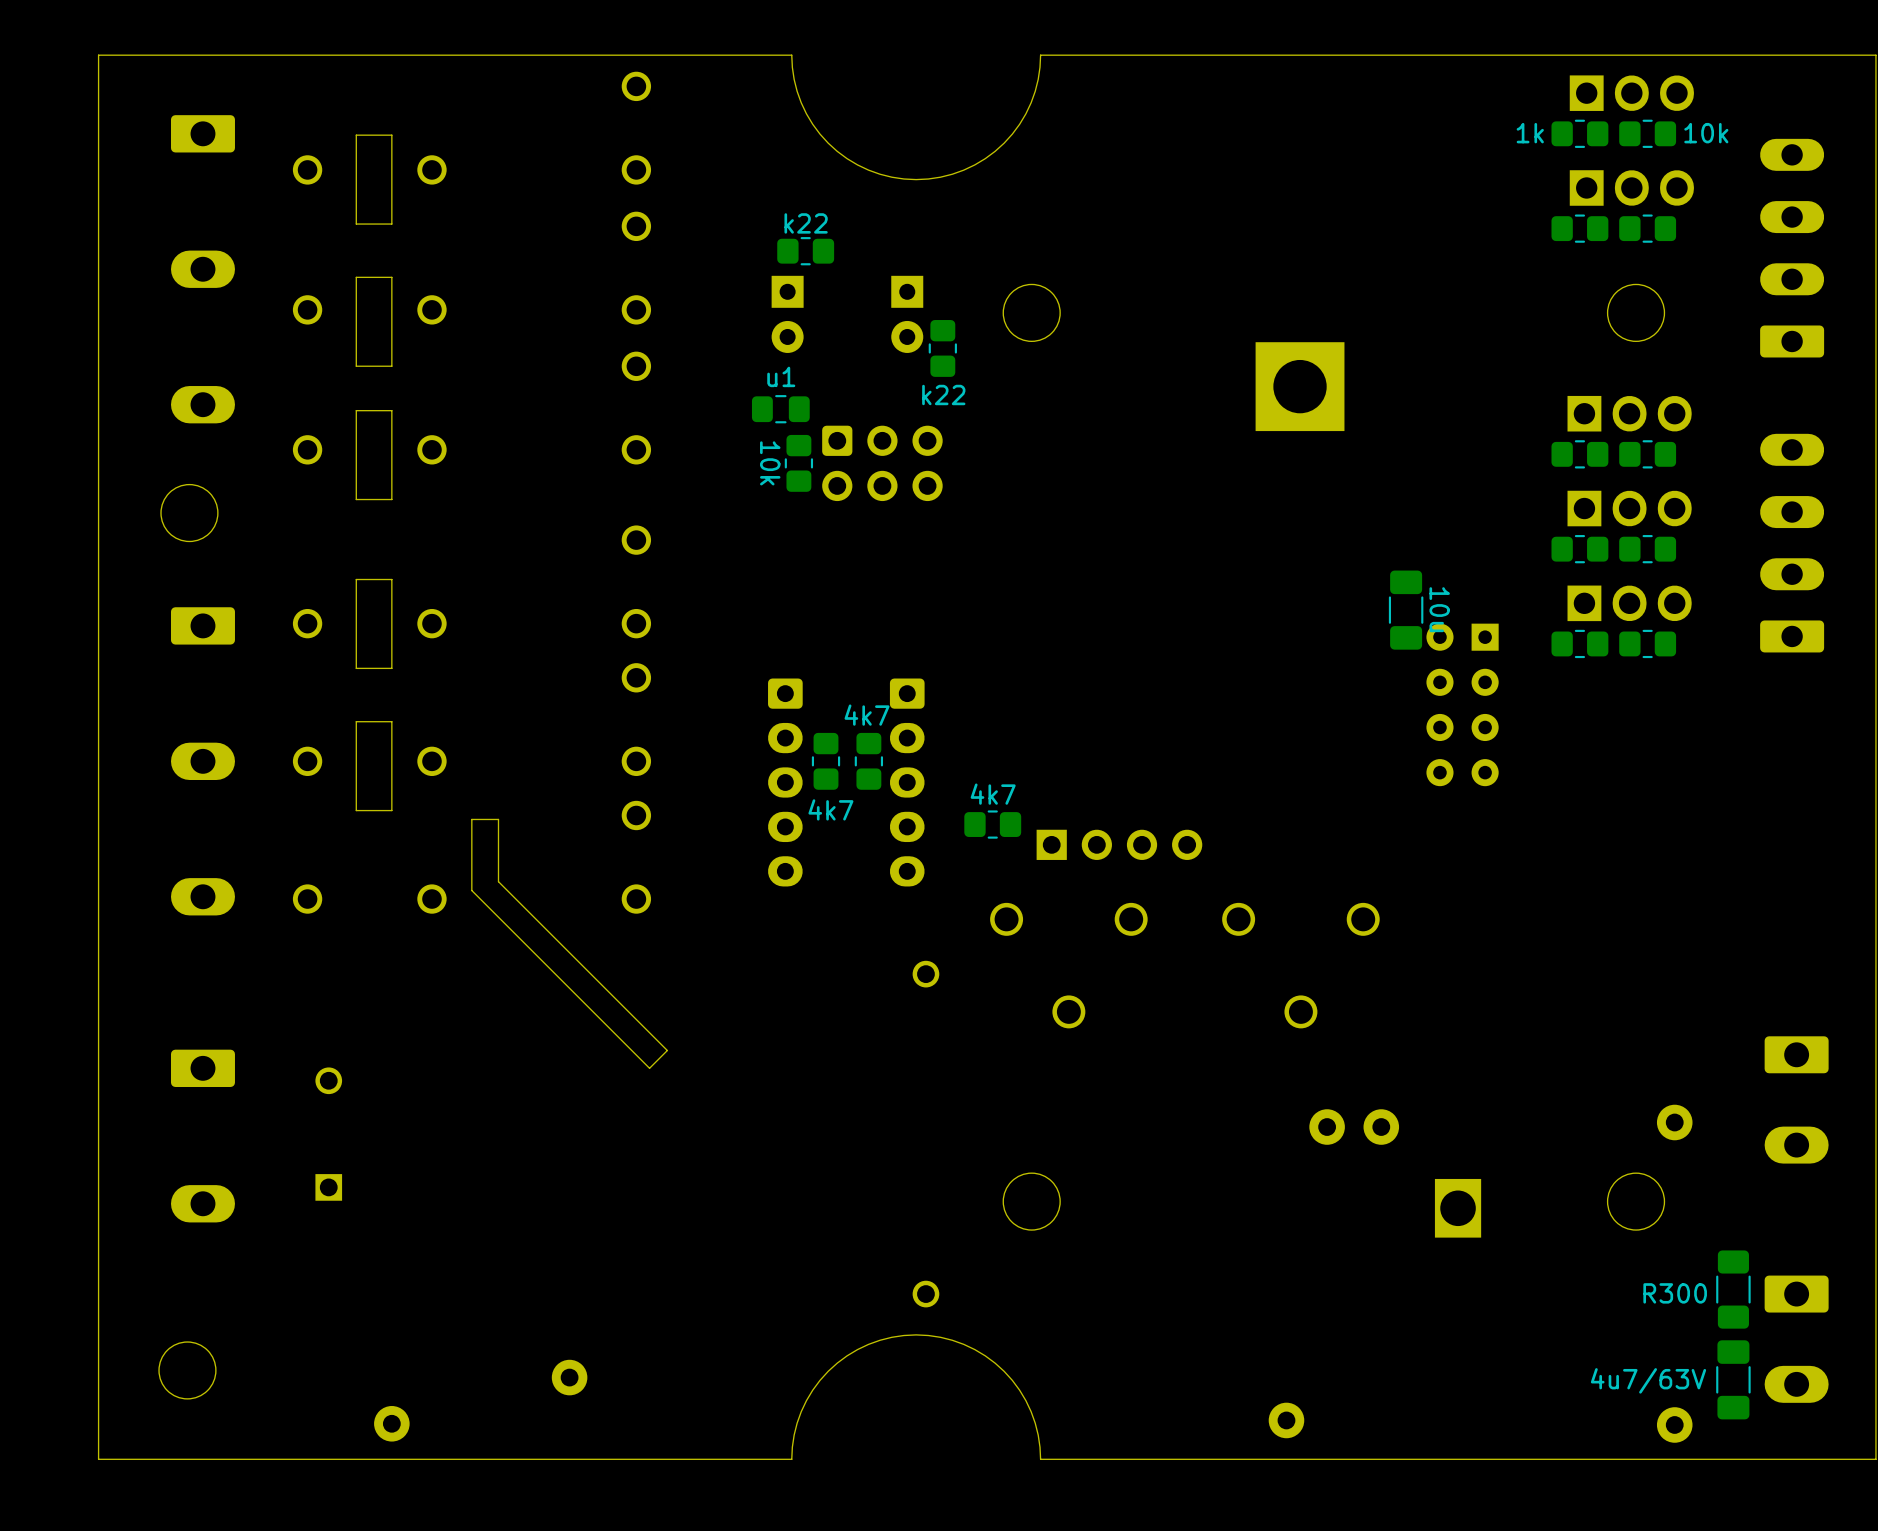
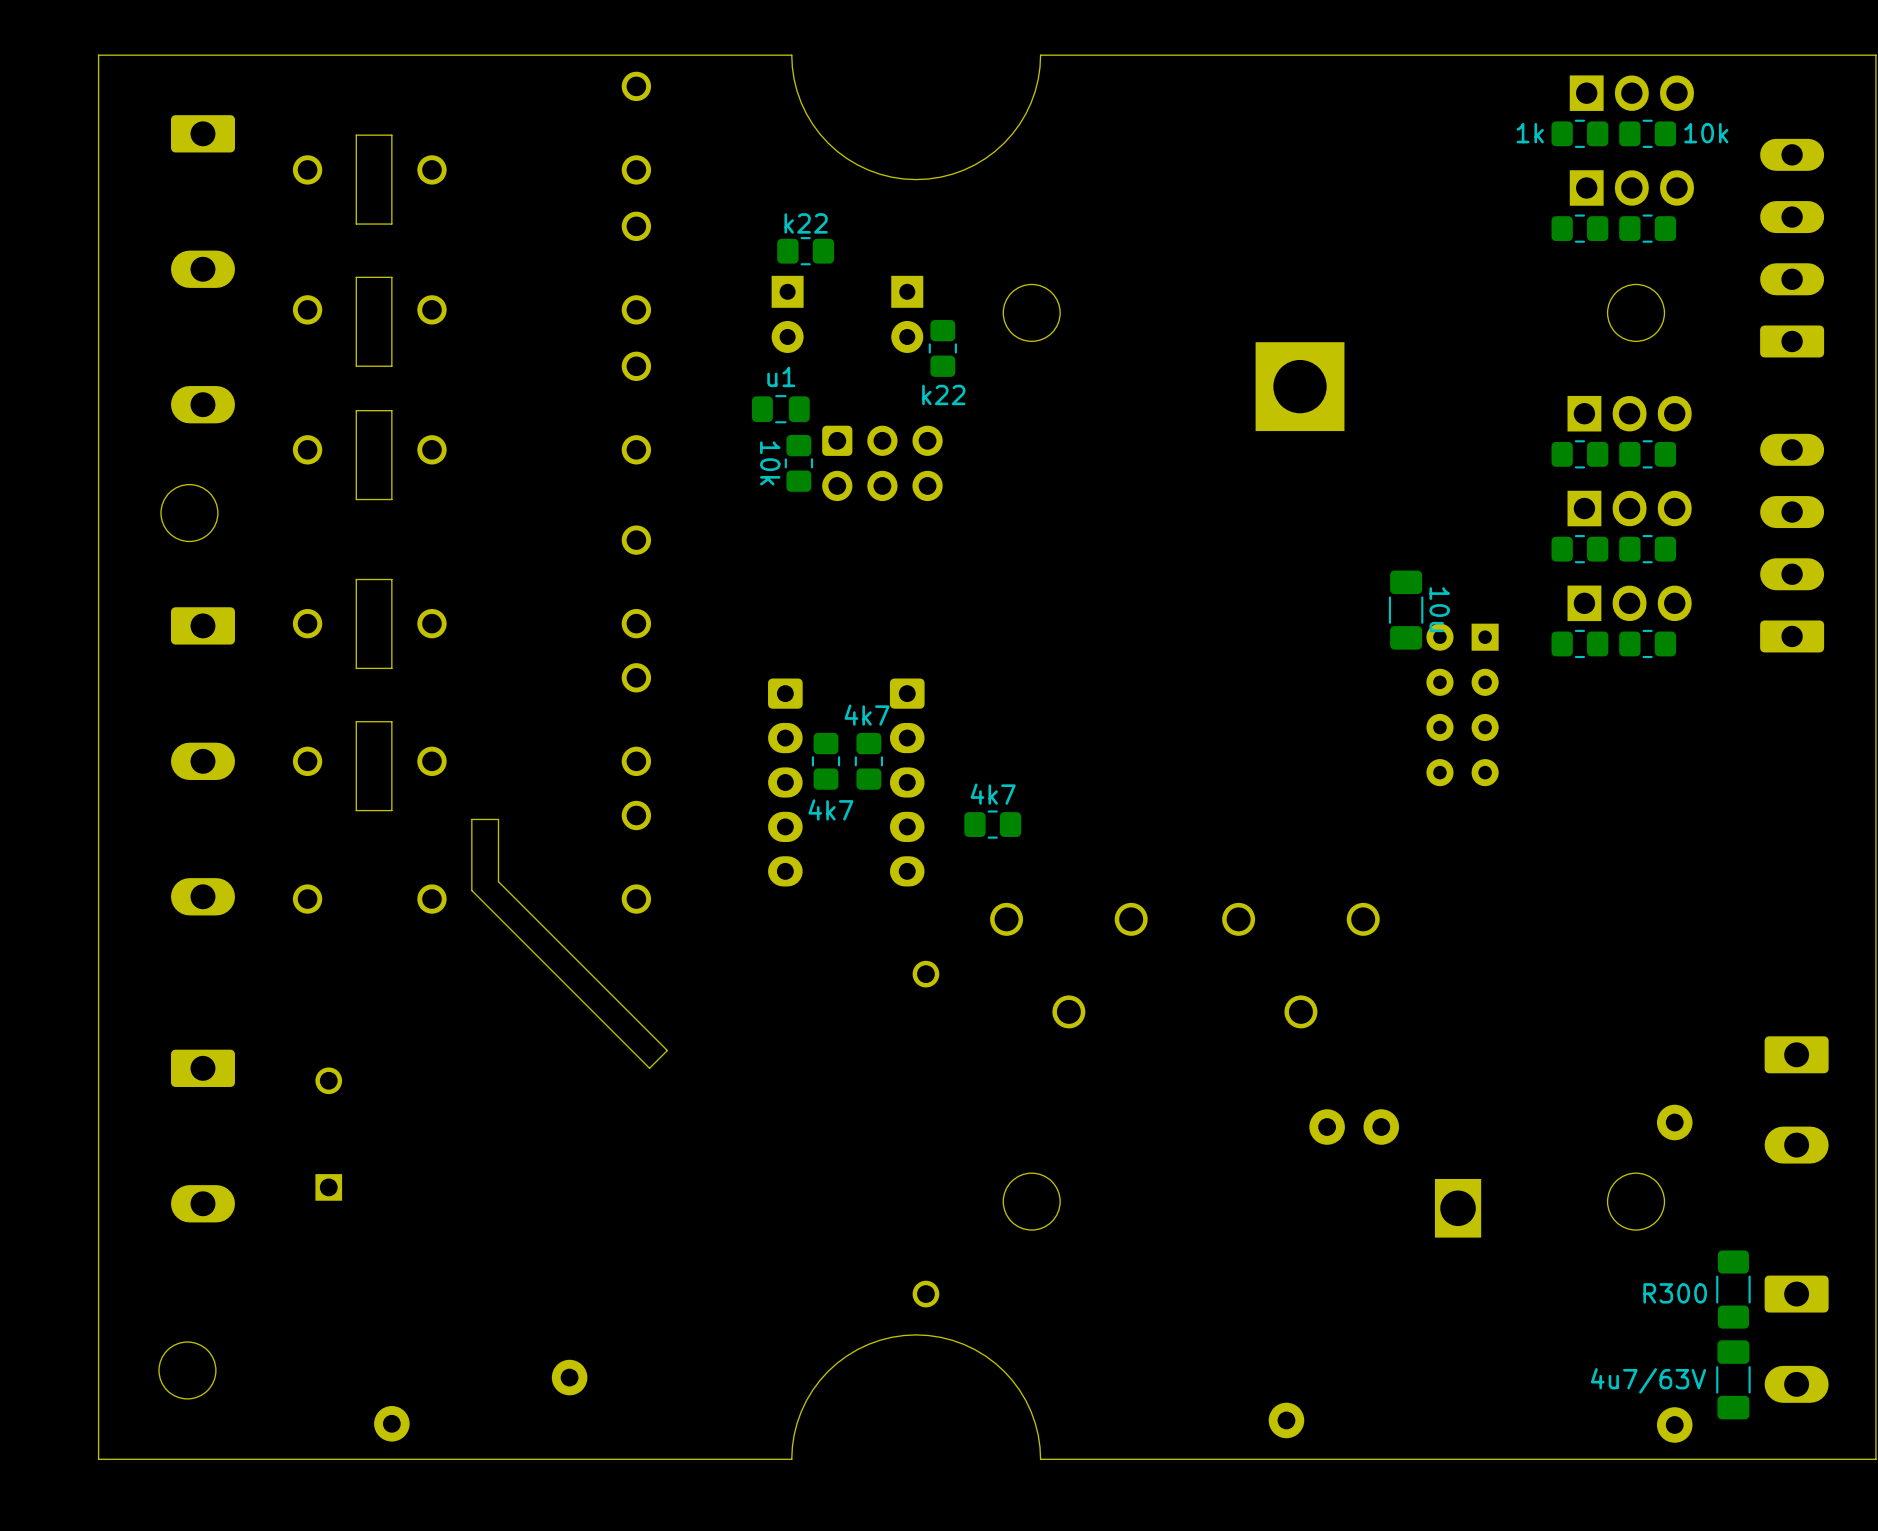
part: (1119, 844) -> none

